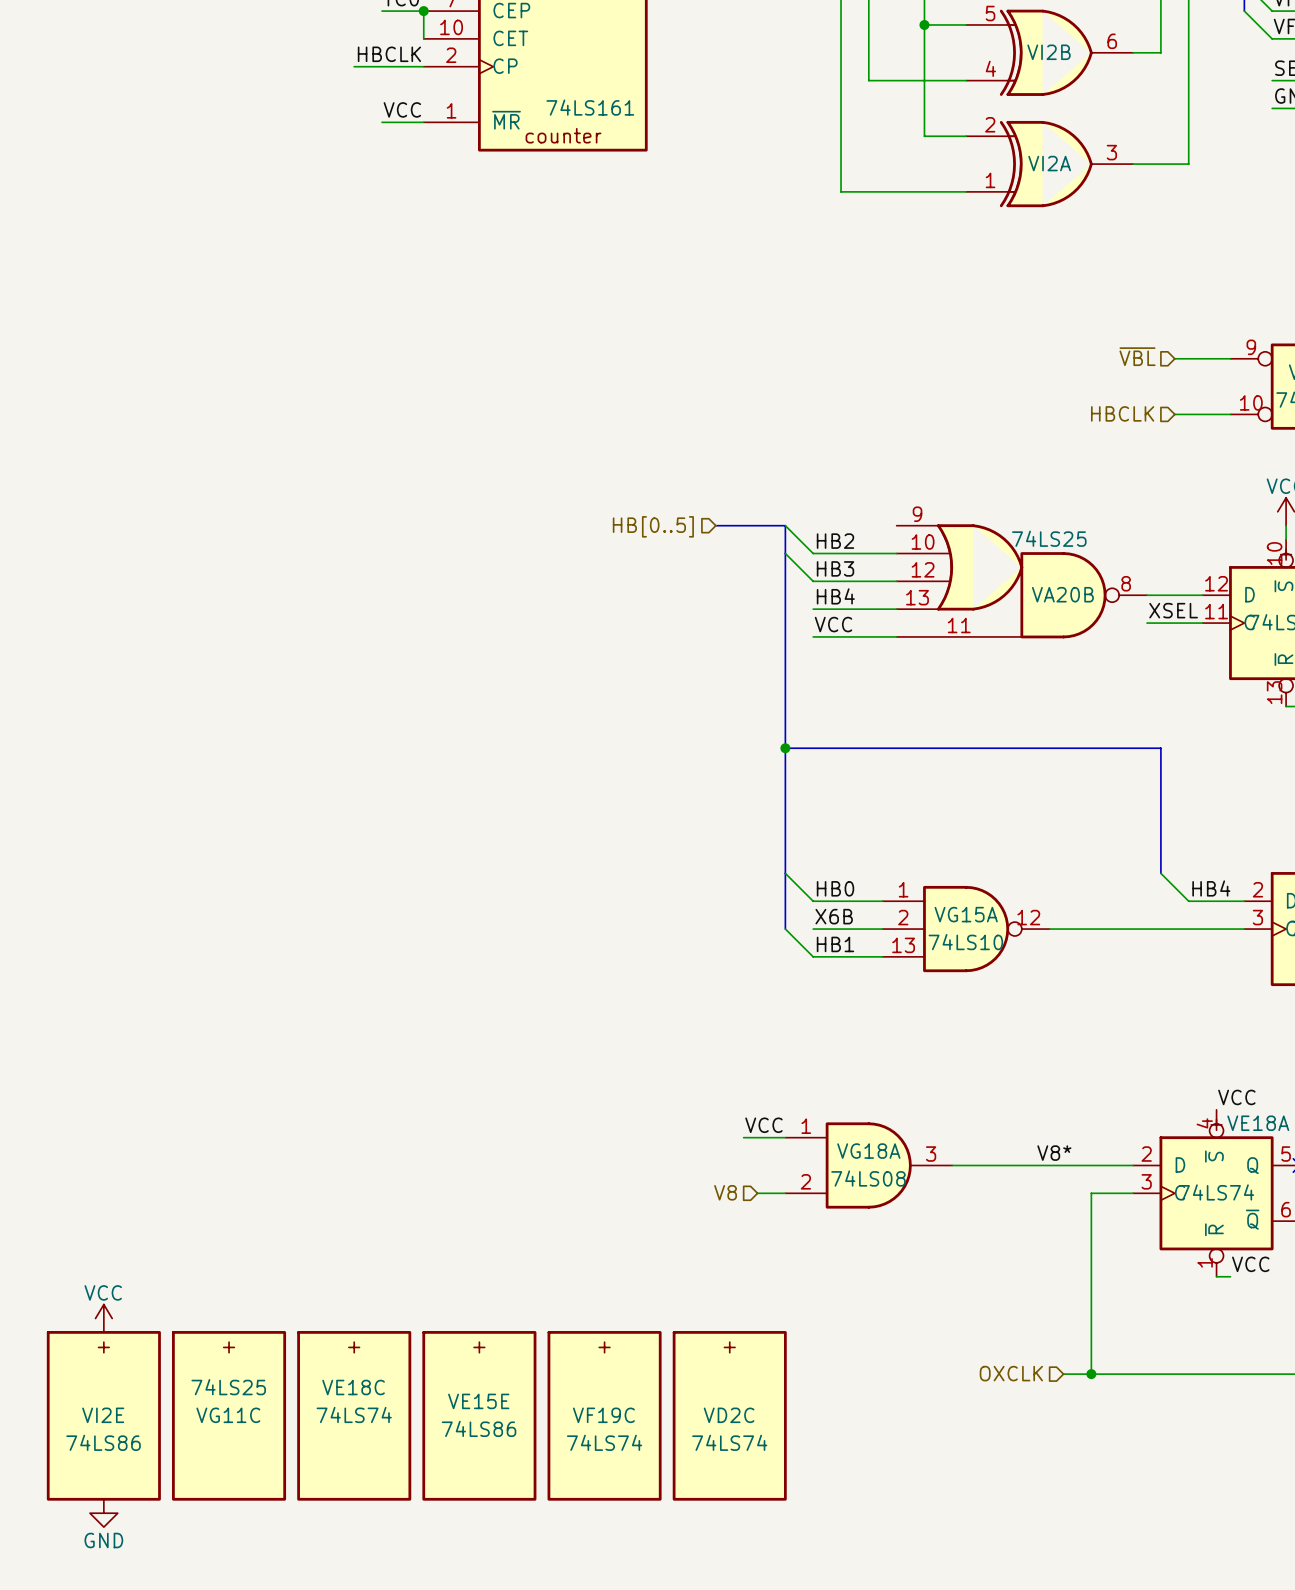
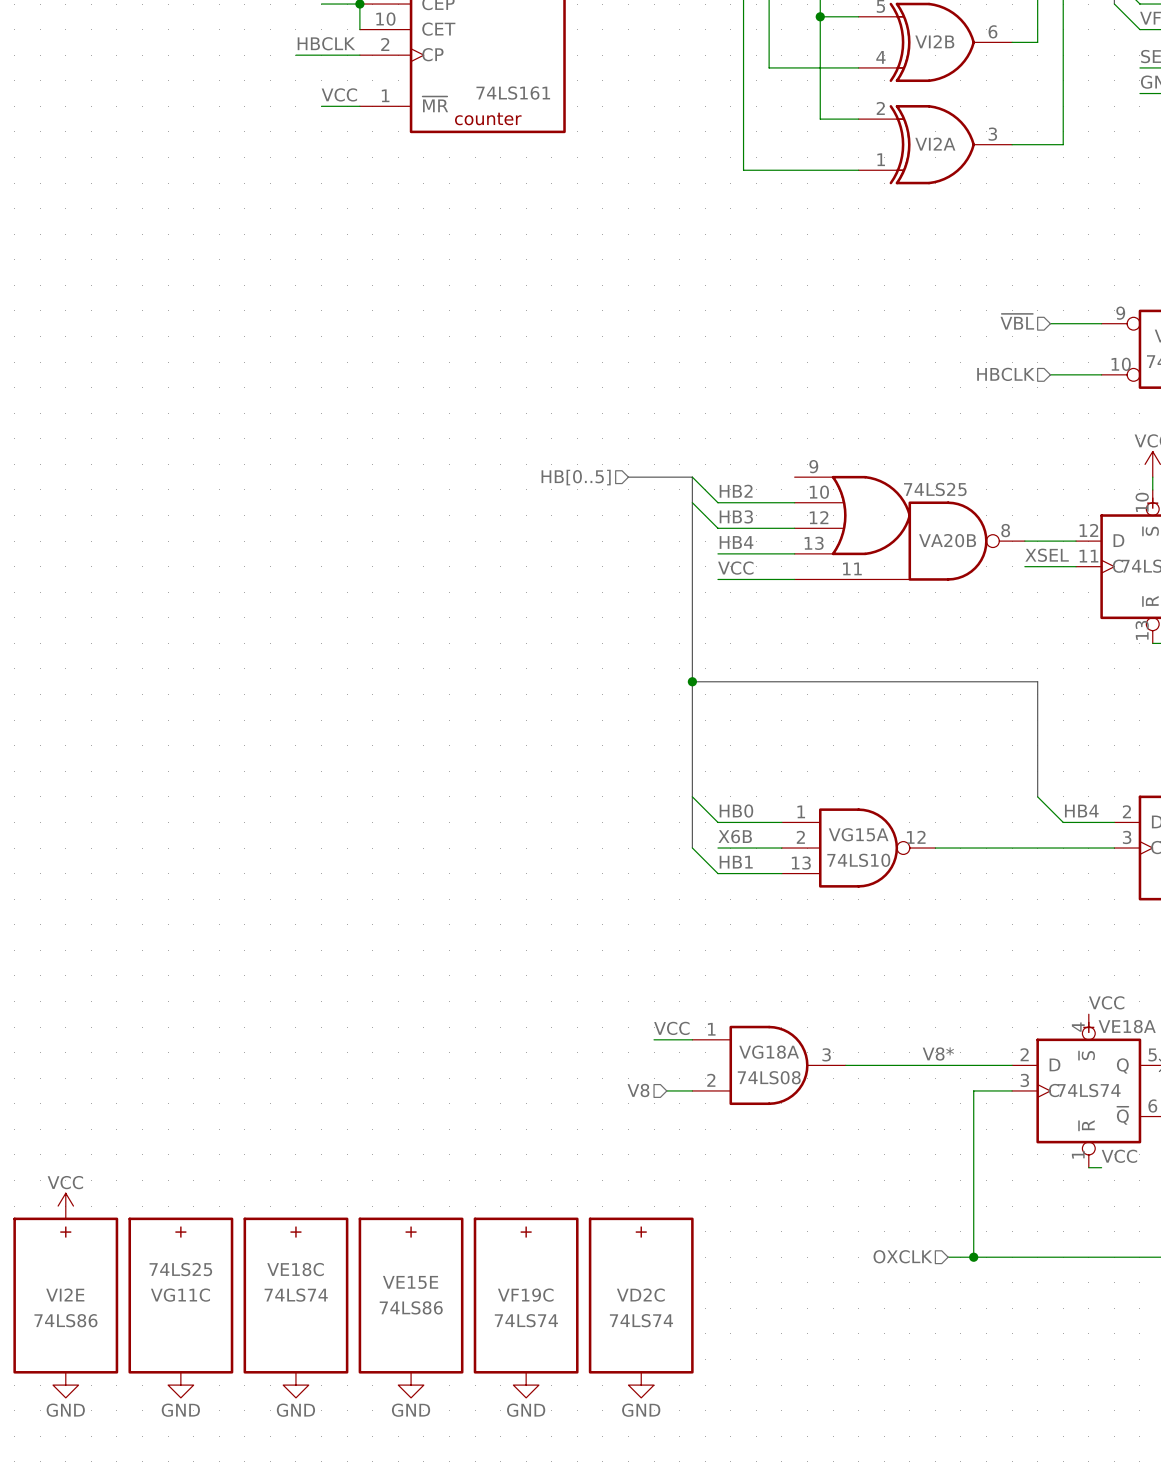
power symbol: none -> GND (180, 1385)
power symbol: none -> GND (295, 1385)
power symbol: none -> GND (411, 1385)
power symbol: none -> GND (526, 1385)
power symbol: none -> GND (641, 1385)

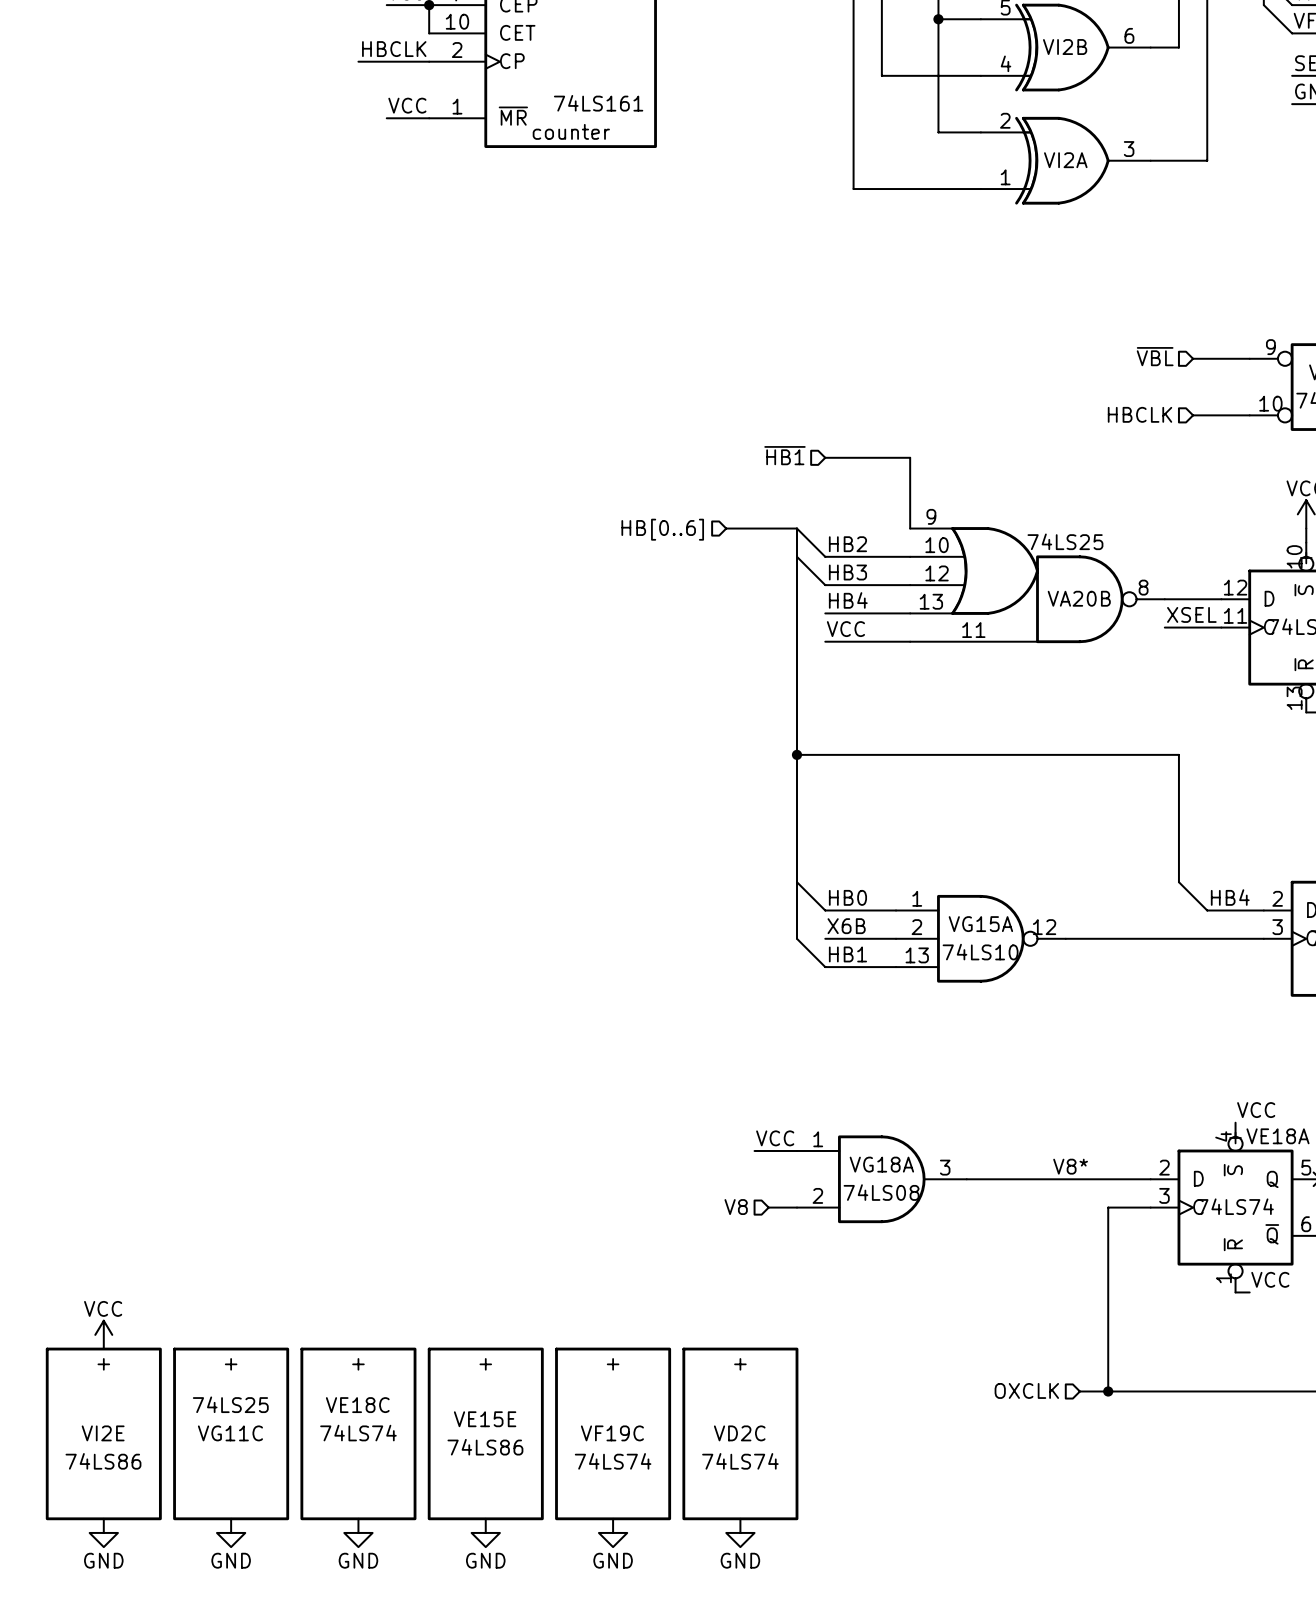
hierarchical label: none -> ~{HB1} (784, 455)
wire: none -> (825, 457) (910, 457) (910, 528)
hierarchical label: HB[0..5] (576, 477) -> HB[0..6] (662, 529)

